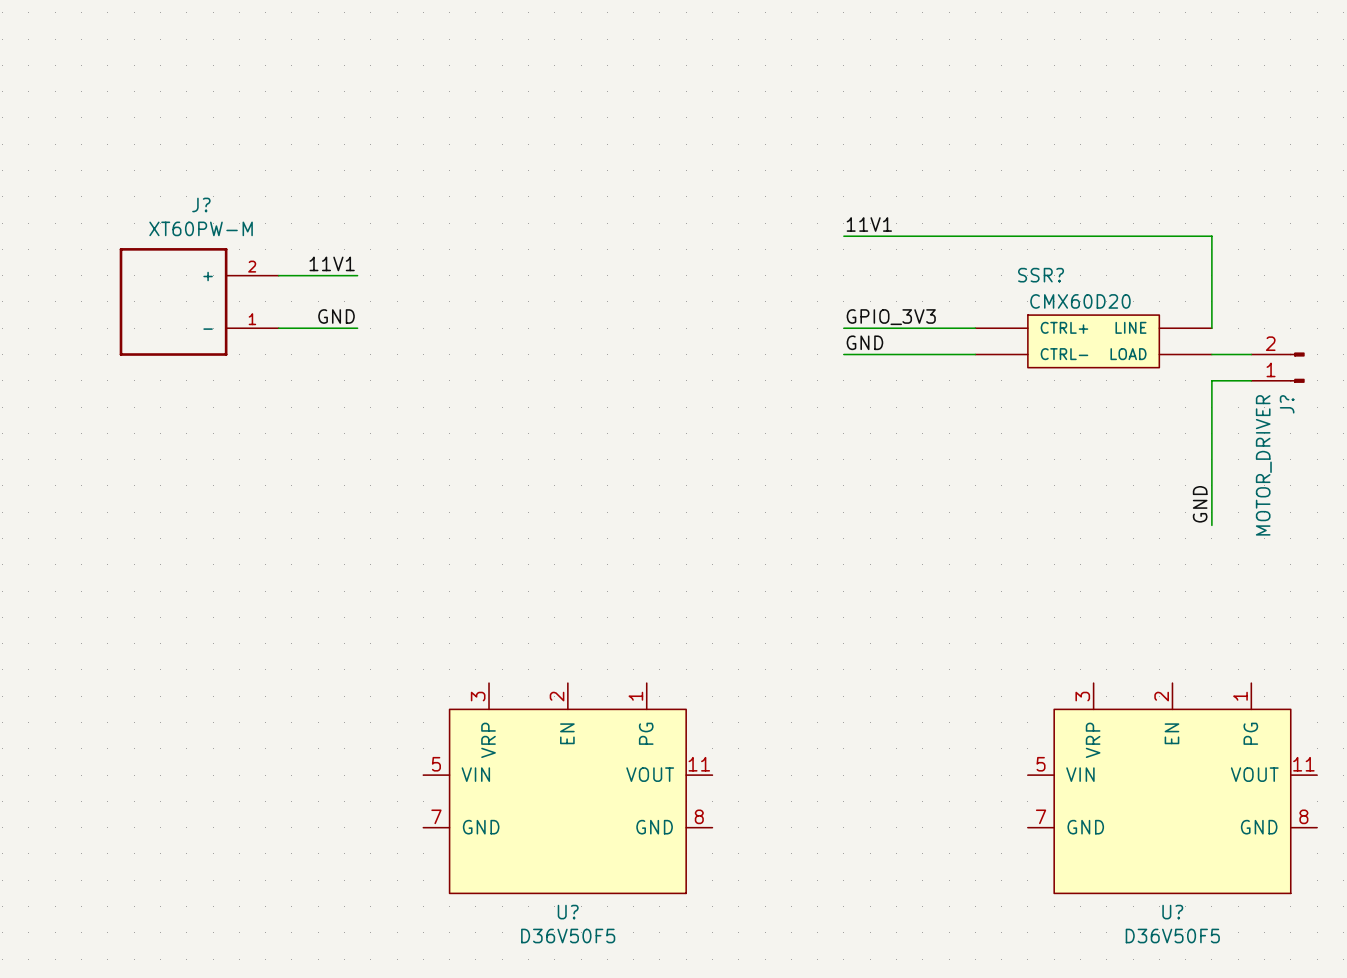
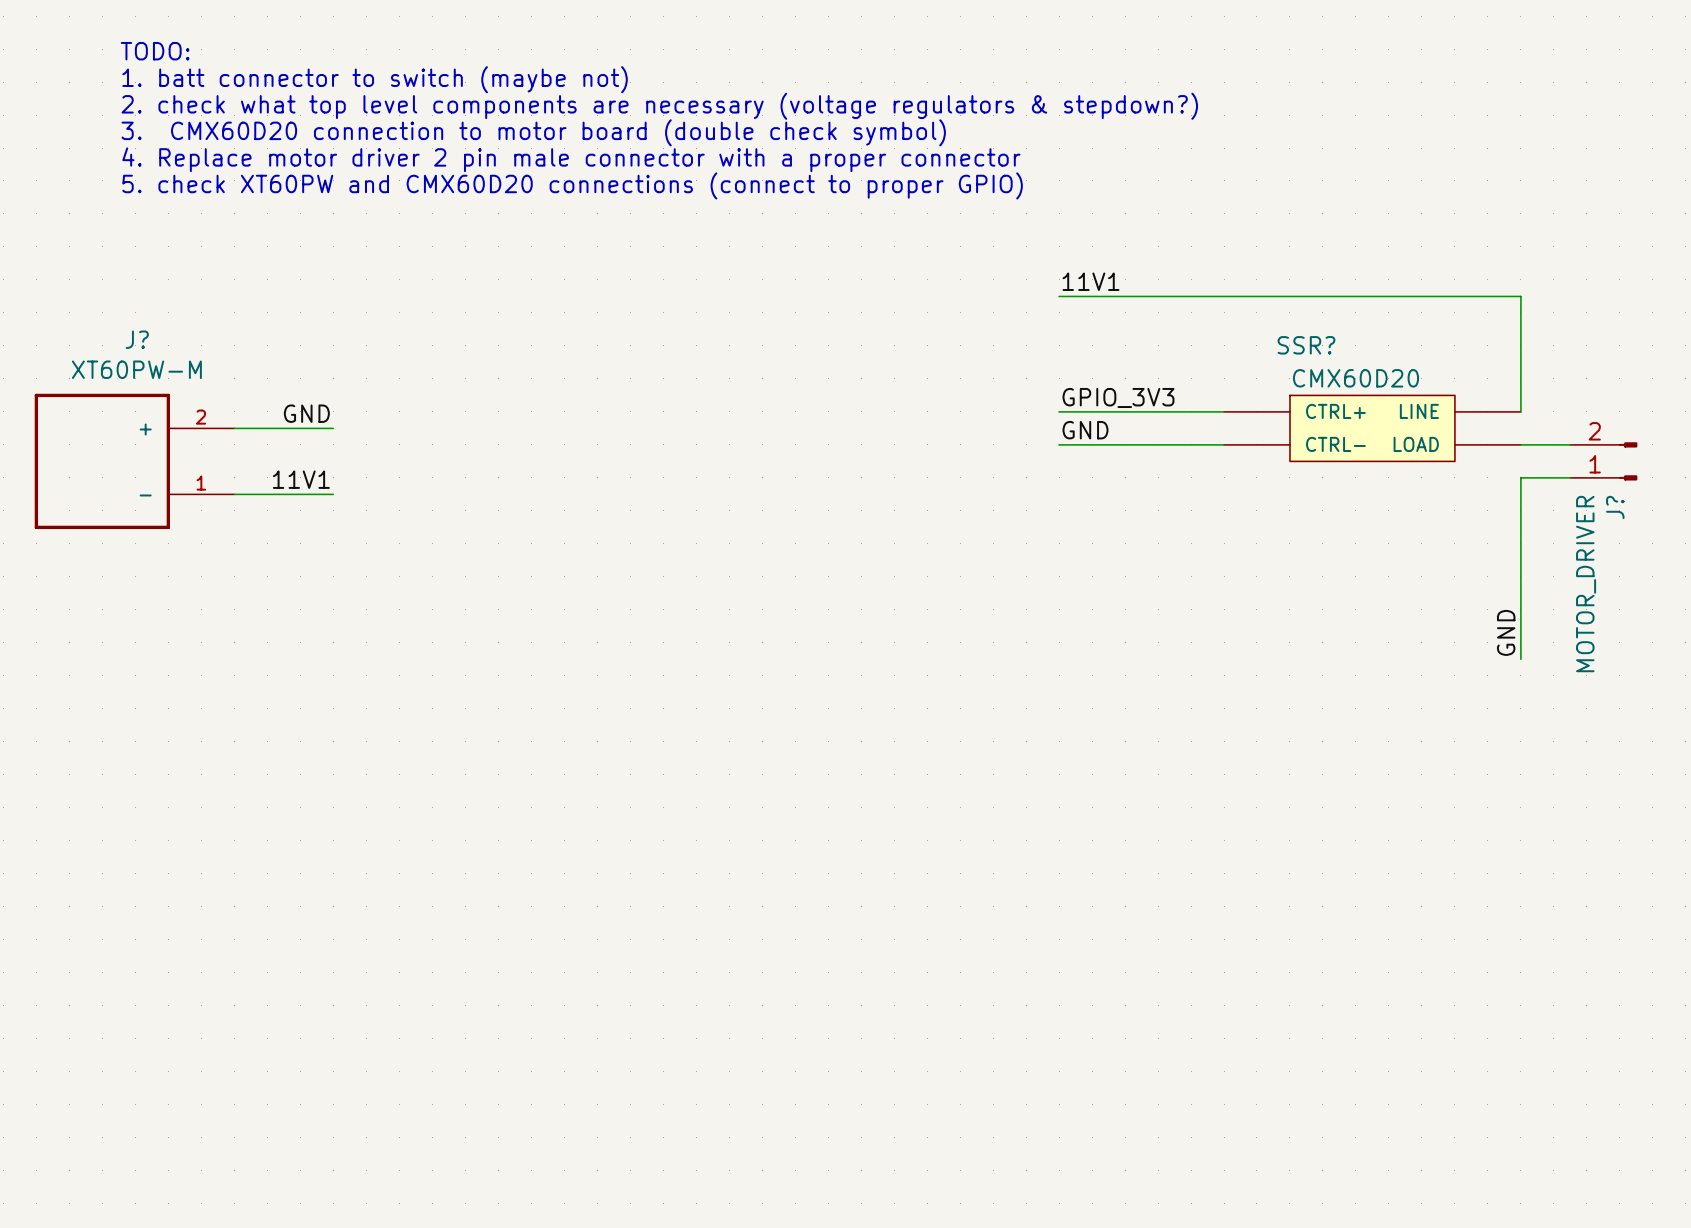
text: none -> TODO: (155, 51)
text: none -> 1. batt connector to switch (maybe not) (375, 79)
text: none -> 2. check what top level components are necessary (voltage regulators & stepdown?) (659, 106)
text: none -> 3. CMX60D20 connection to motor board (double check symbol) (533, 132)
text: none -> 4. Replace motor driver 2 pin male connector with a proper connector (571, 159)
text: none -> 5. check XT60PW and CMX60D20 connections (connect to proper GPIO) (572, 185)
label position: 11V1 (332, 263) -> 11V1 (301, 479)
wire: (278, 275) (357, 275) -> (234, 428) (333, 428)
J? position: (199, 301) -> (134, 461)
label position: GND (336, 316) -> GND (306, 413)
wire: (278, 328) (357, 328) -> (234, 494) (333, 494)
U?: D36V50F5 (567, 788) -> none
U?: D36V50F5 (1172, 788) -> none

